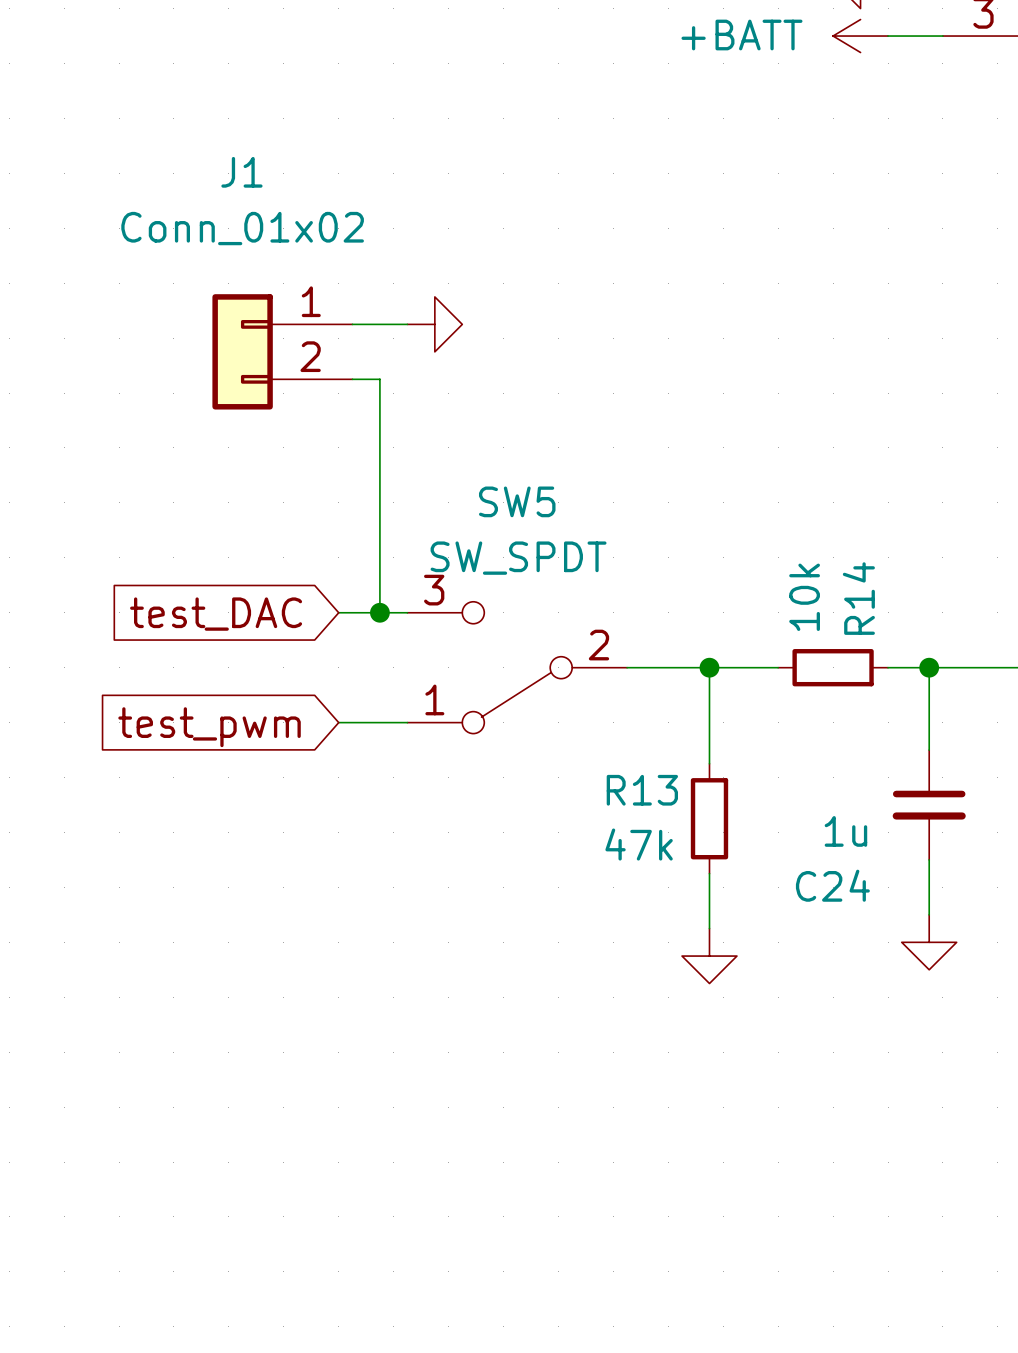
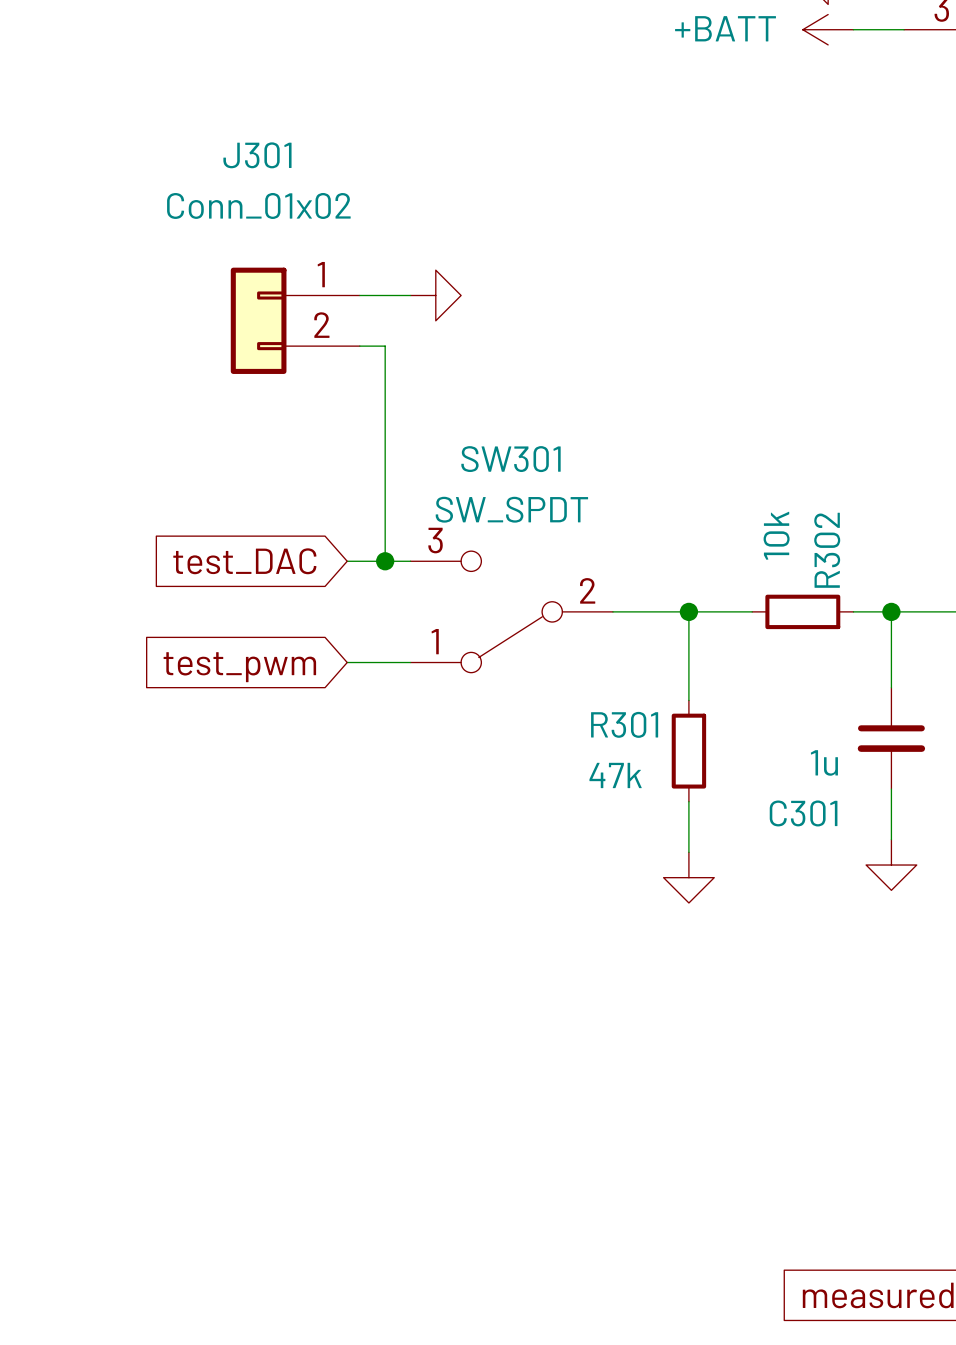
J1 name: J1 (241, 172) -> J301 (257, 155)
SW5 name: SW5 (517, 501) -> SW301 (511, 459)
R14 name: R14 (858, 598) -> R302 (827, 550)
R13 name: R13 (642, 790) -> R301 (624, 724)
C24 name: C24 (832, 885) -> C301 (803, 813)

